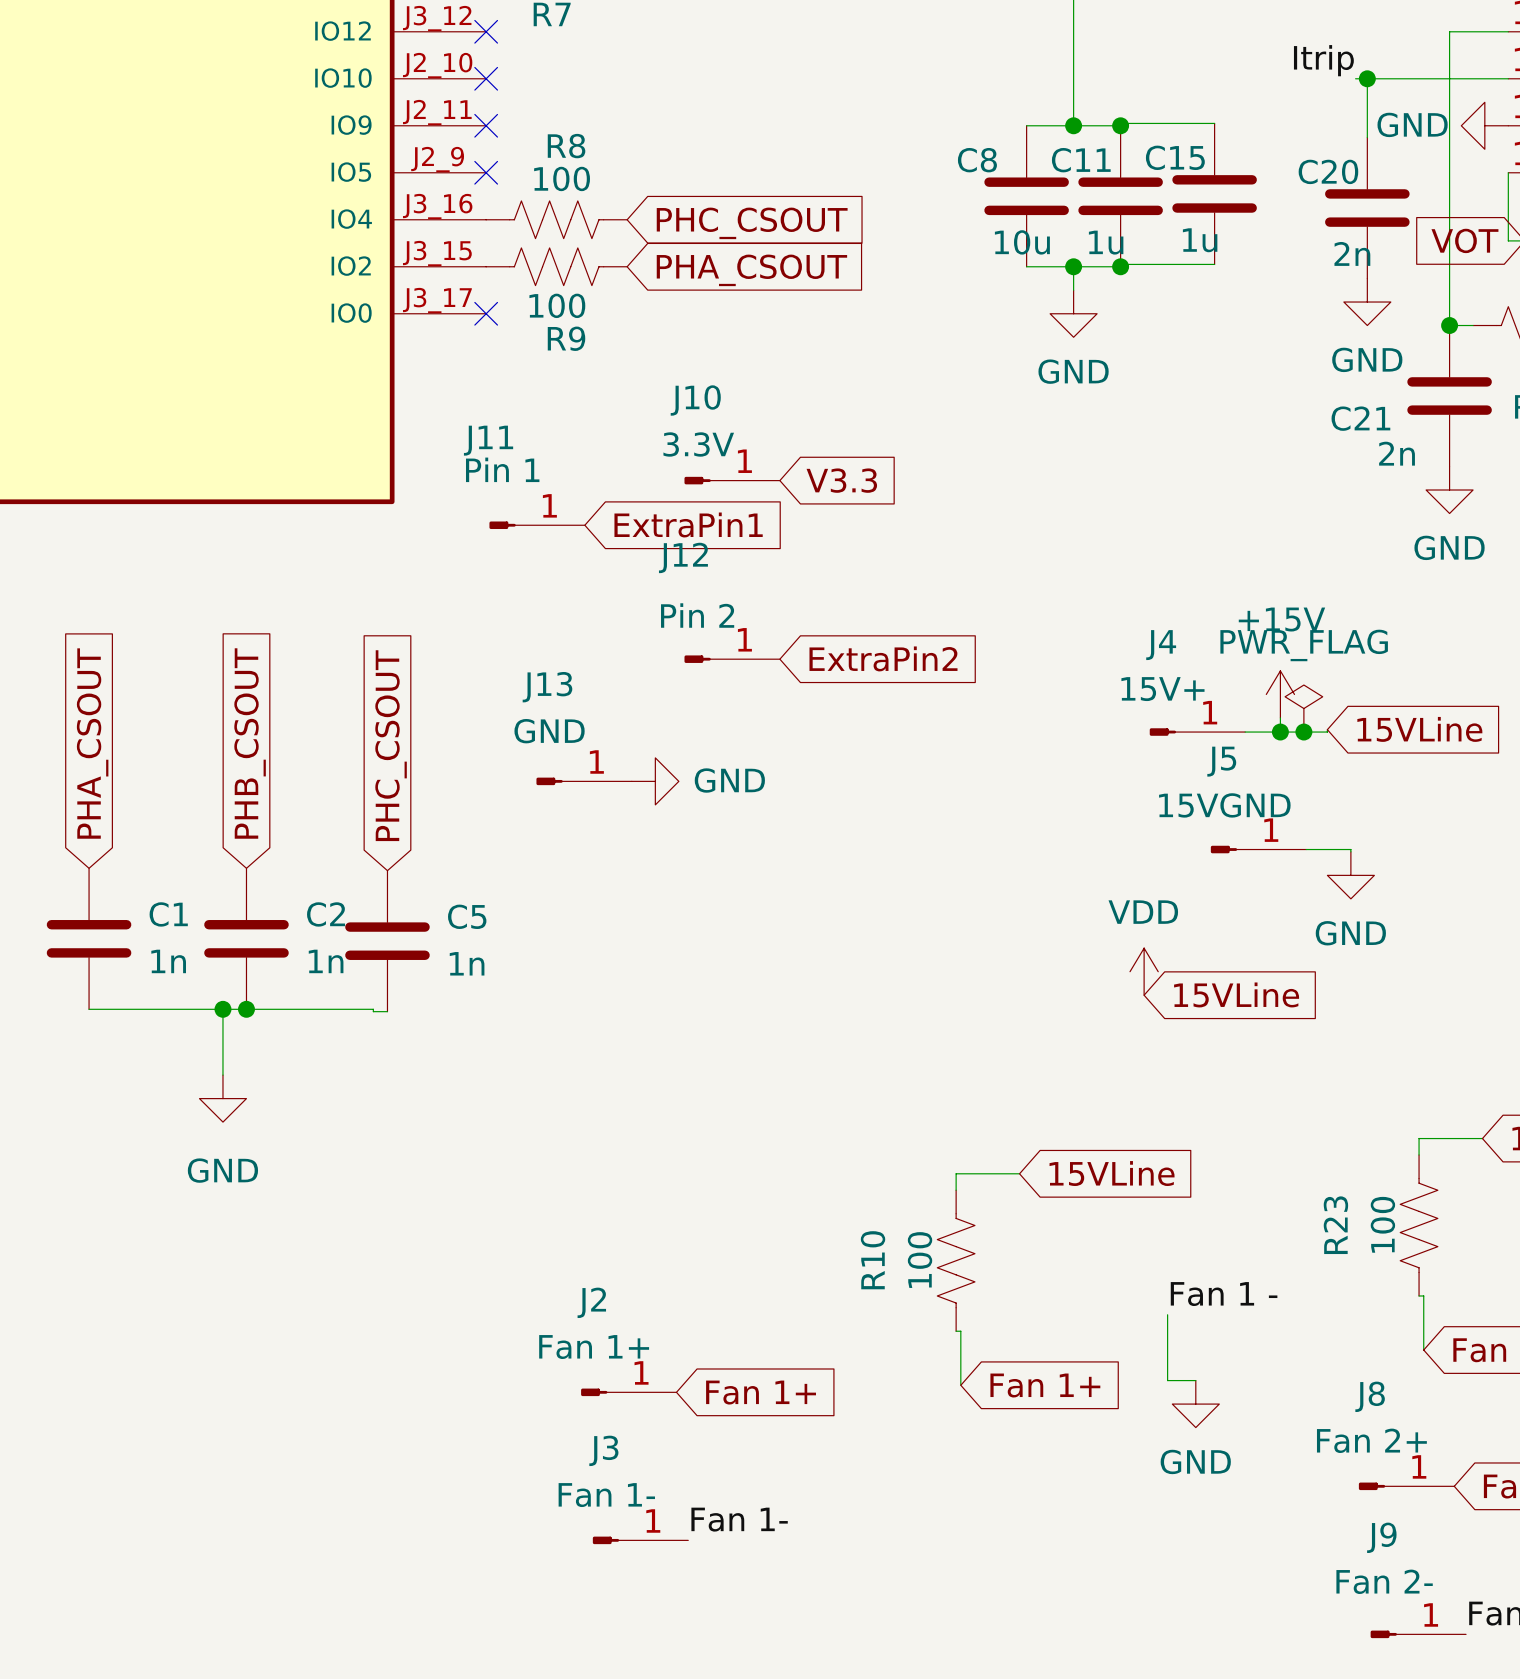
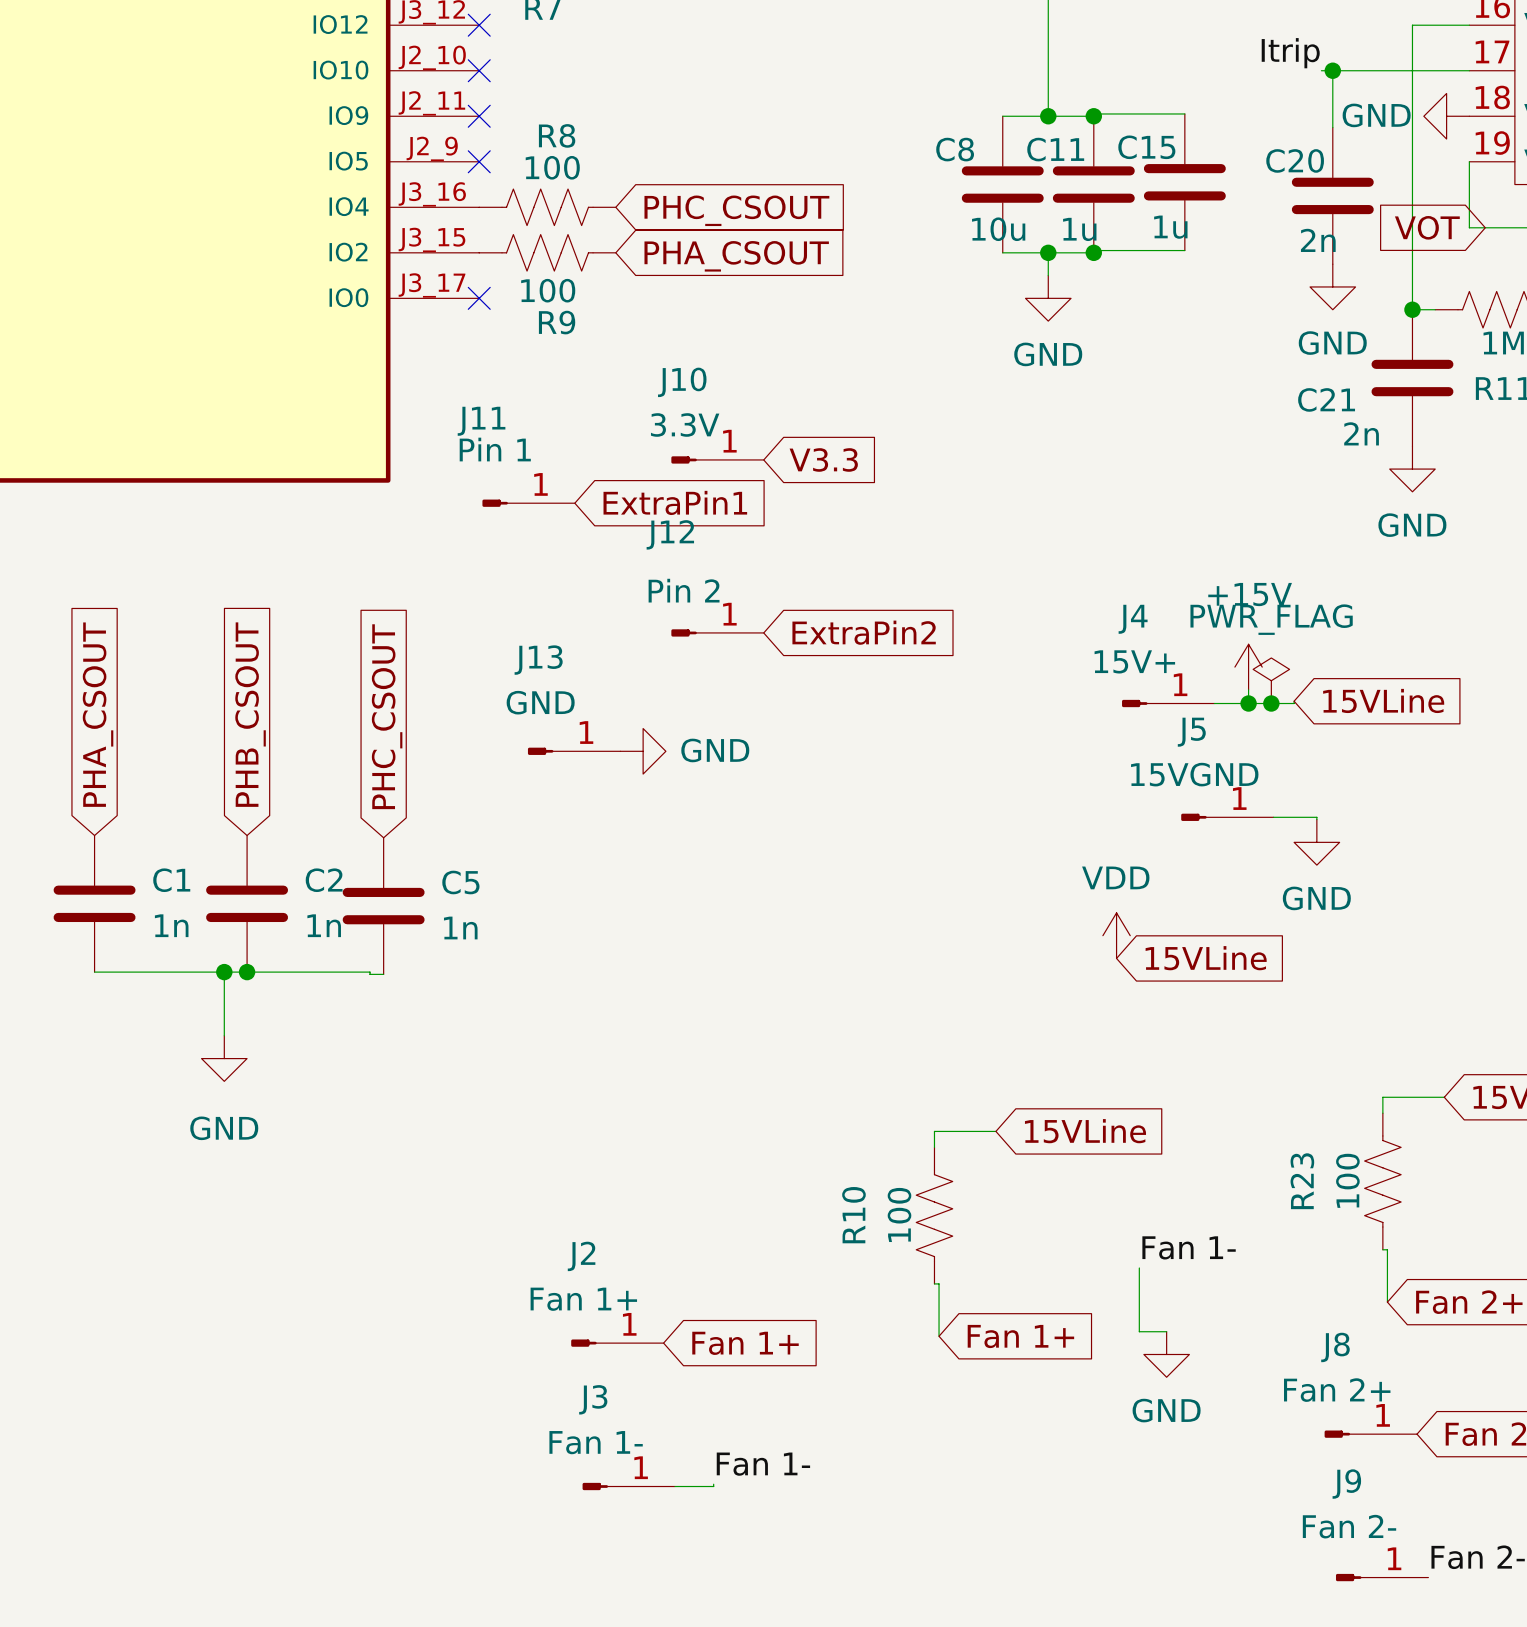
label: Fan 1 - (1224, 1294) -> Fan 1- (1189, 1247)
label position: Fan 1- (739, 1519) -> Fan 1- (763, 1464)
wire: none -> (713, 1484) (713, 1486) (674, 1486)

